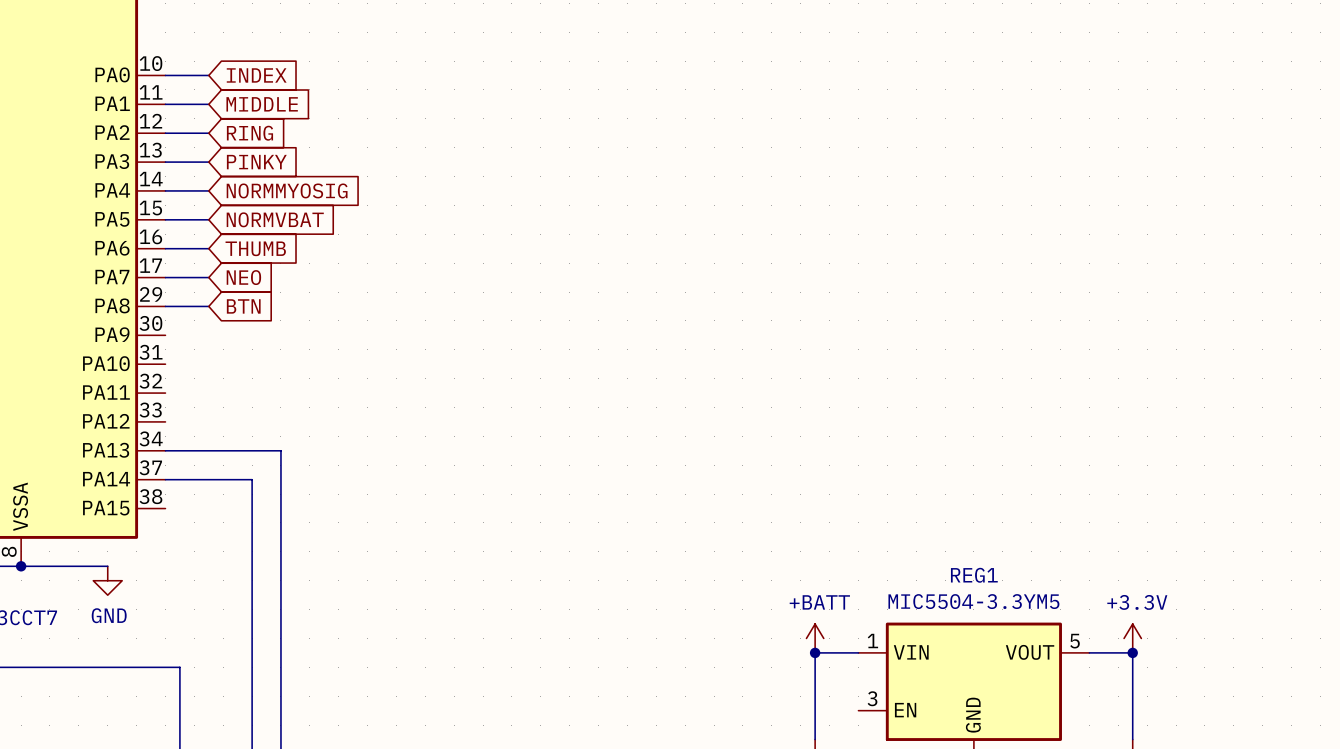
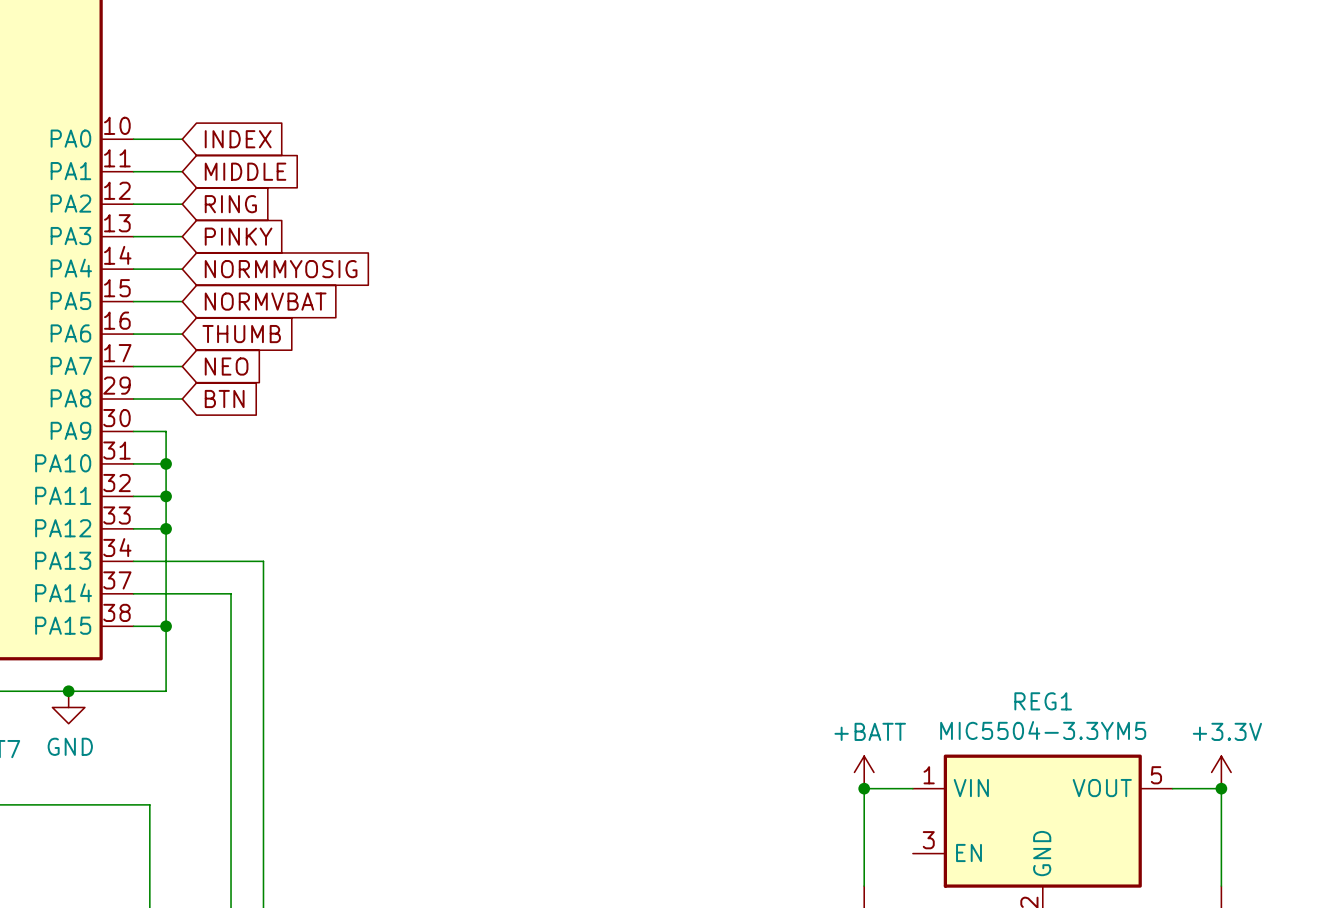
wire: none -> (133, 431) (166, 431) (166, 691) (68, 691)
wire: none -> (133, 463) (166, 463)
junction: none -> (166, 463)
wire: none -> (133, 496) (166, 496)
junction: none -> (166, 496)
wire: none -> (133, 528) (166, 528)
junction: none -> (166, 528)
wire: none -> (133, 626) (166, 626)
junction: none -> (166, 626)
junction: none -> (68, 691)

